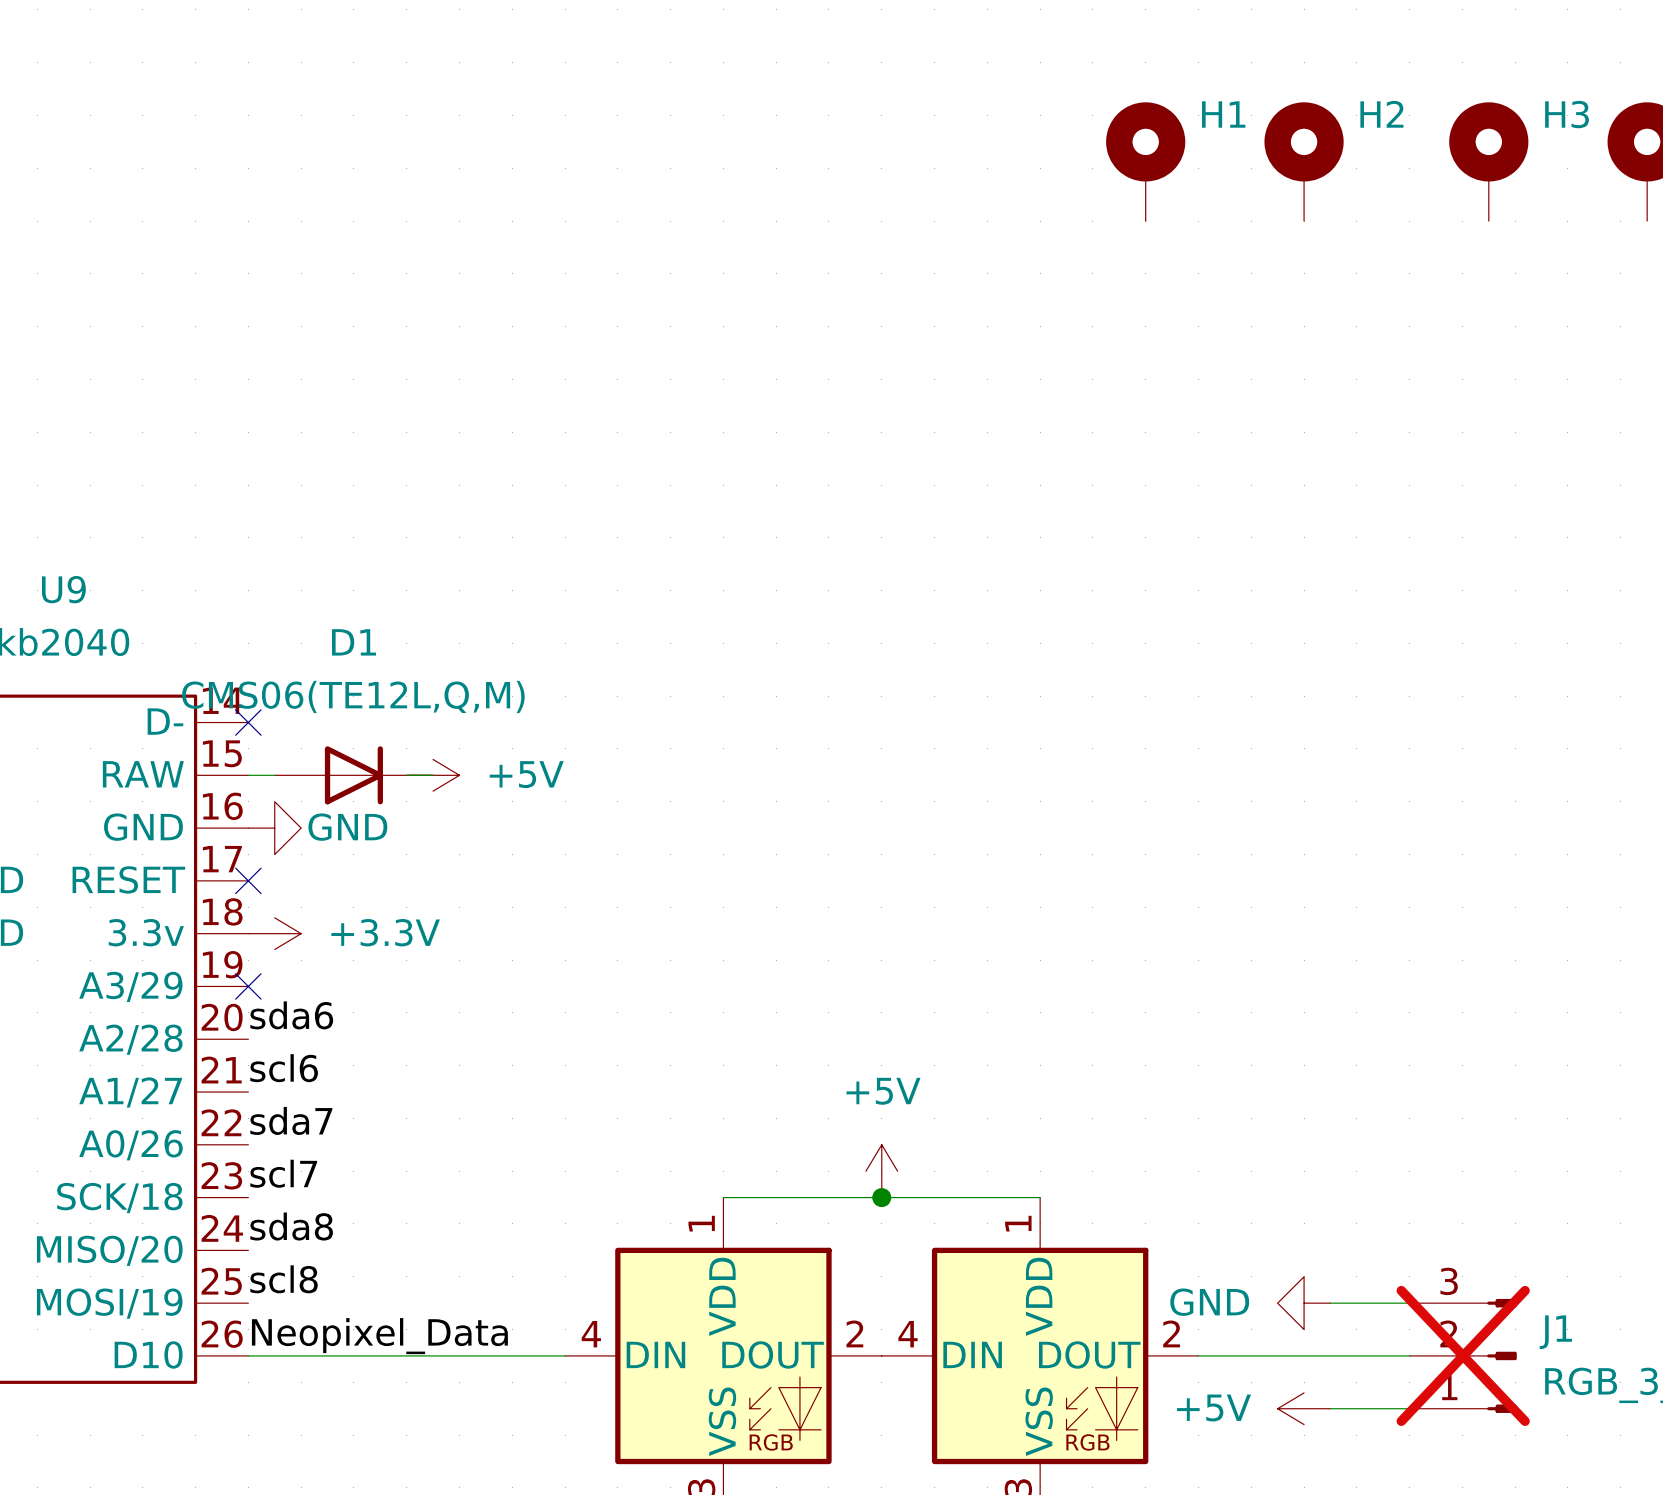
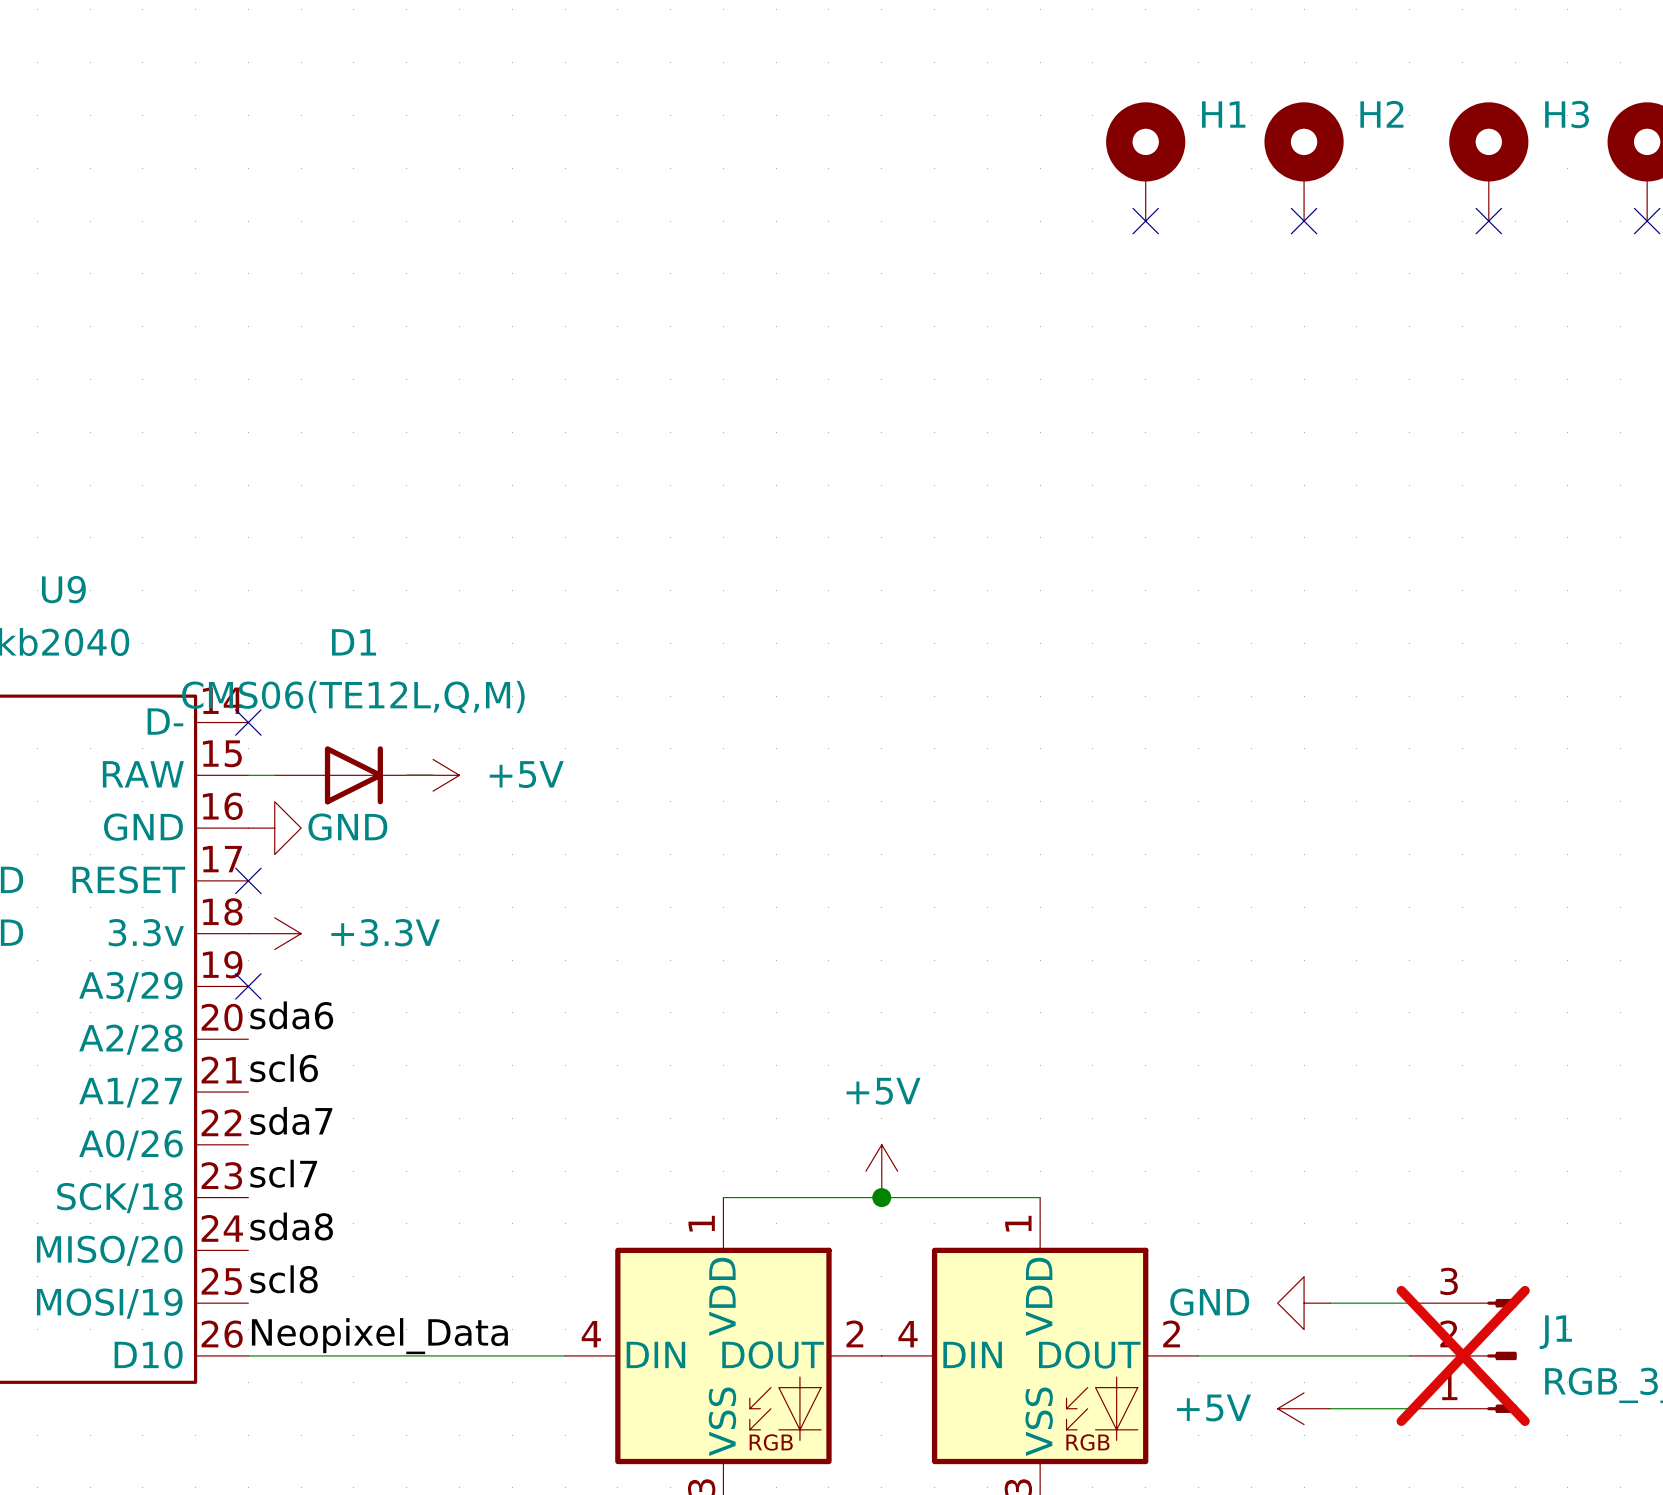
no-connect mark: none -> (1145, 221)
no-connect mark: none -> (1304, 221)
no-connect mark: none -> (1488, 221)
no-connect mark: none -> (1647, 221)

